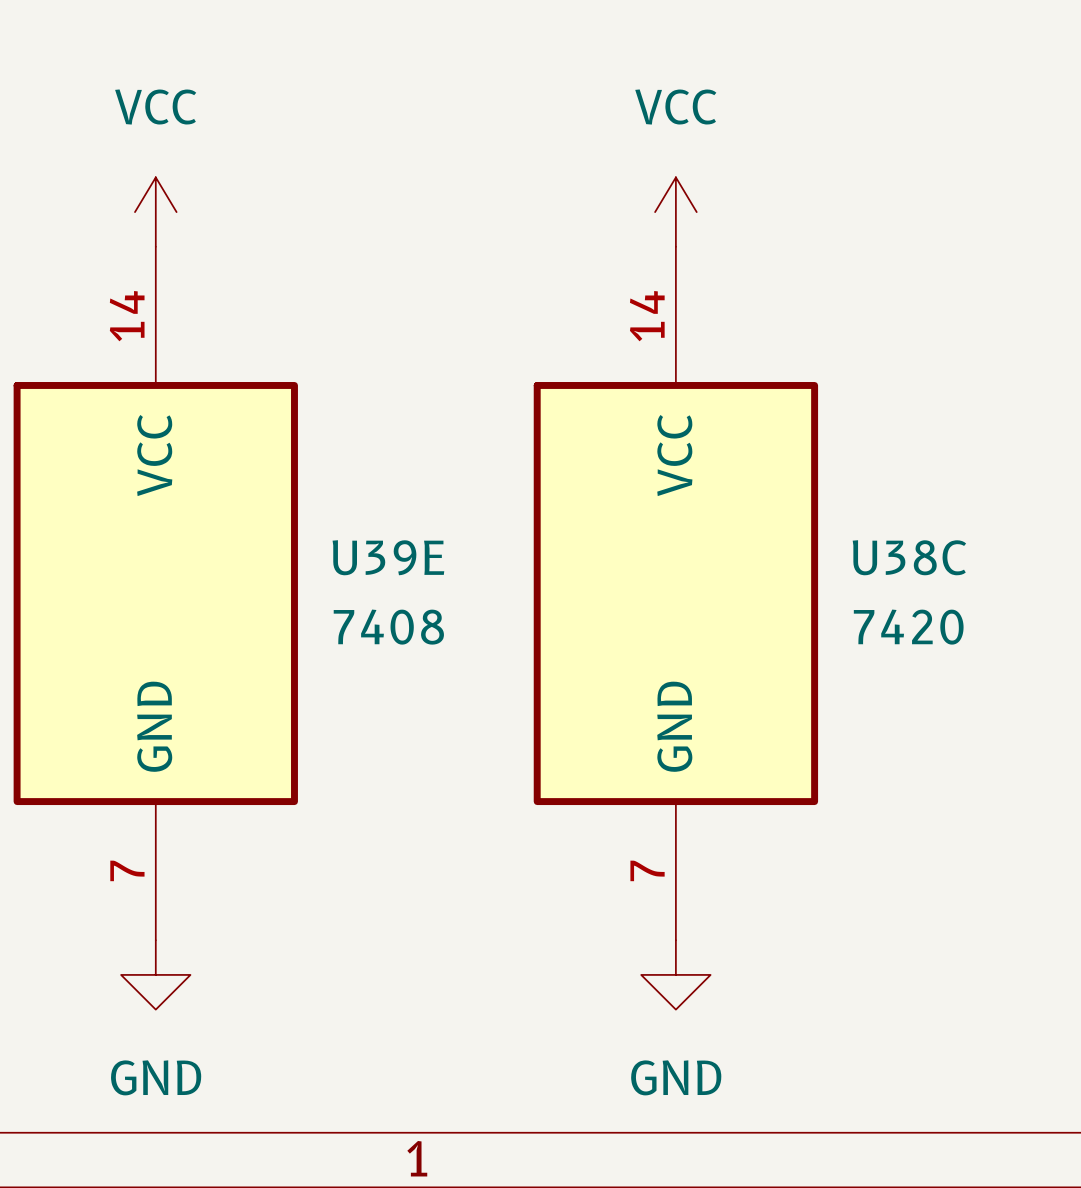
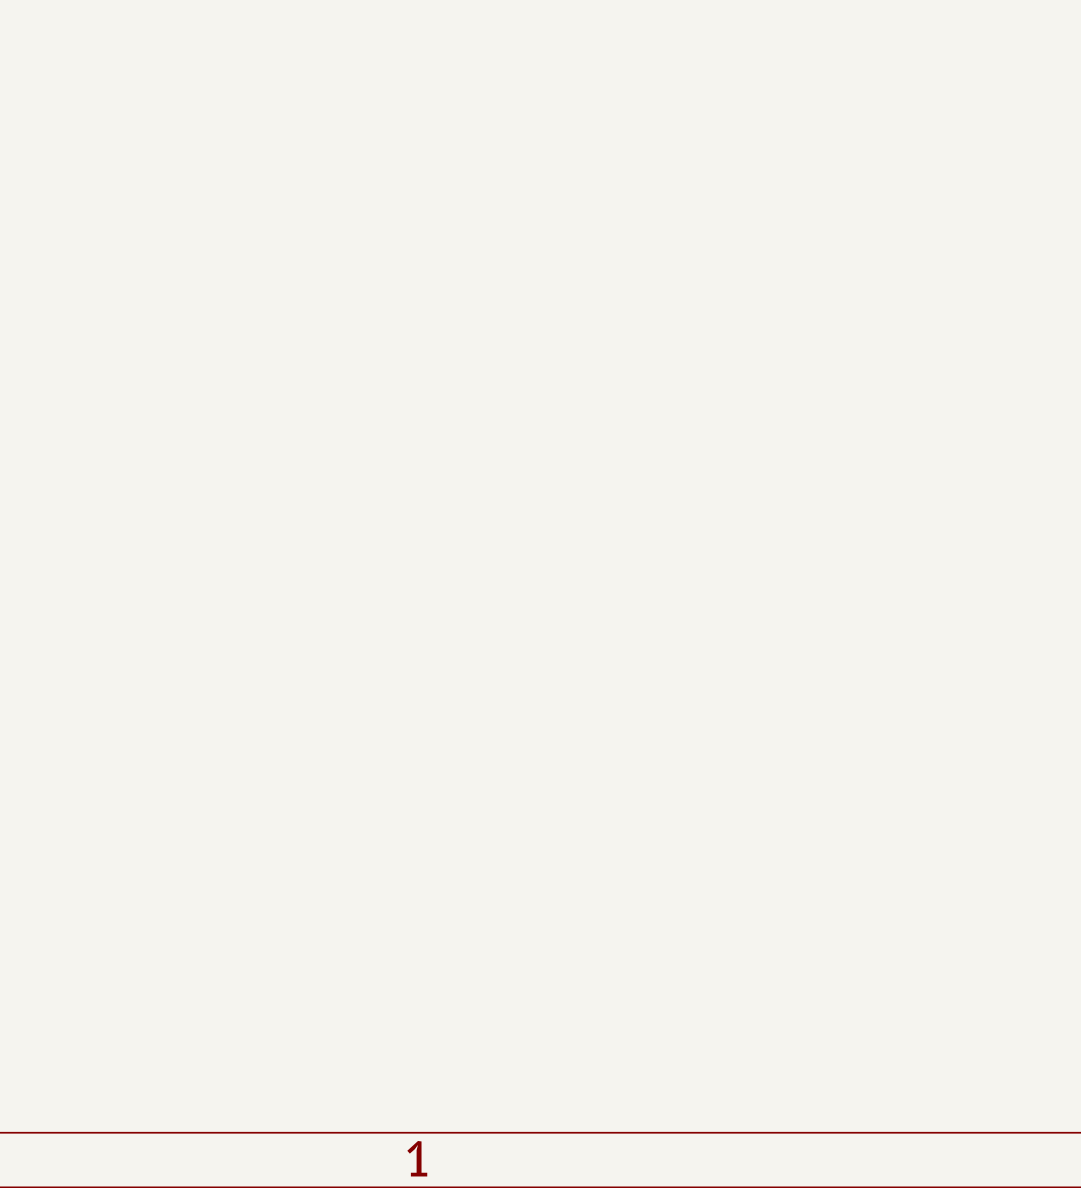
power symbol: VCC (155, 212) -> none
power symbol: VCC (675, 212) -> none
U39E: 7408 (155, 593) -> none
U38C: 7420 (675, 593) -> none
power symbol: GND (155, 974) -> none
power symbol: GND (675, 974) -> none

